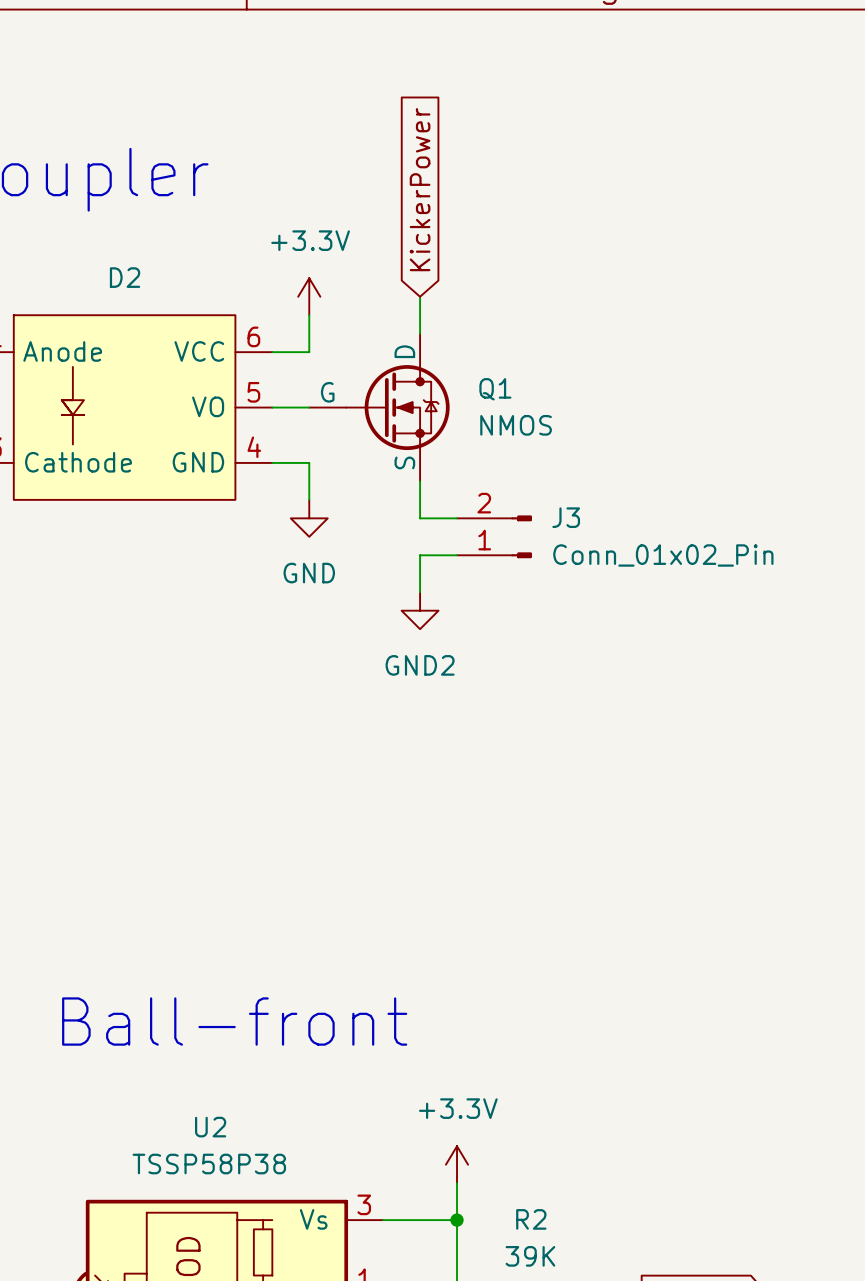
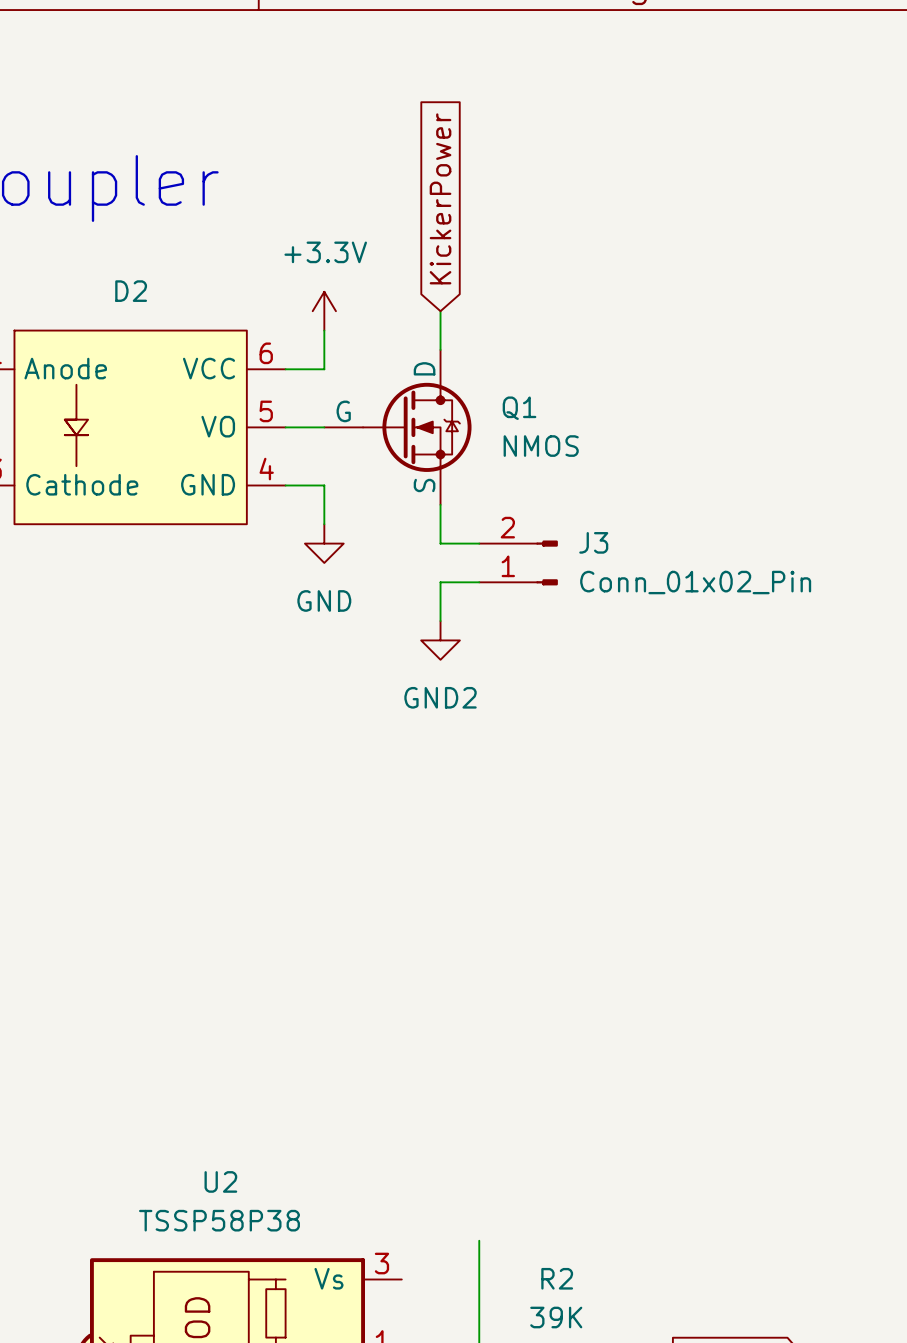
text: Ball-front (234, 1021) -> none
power symbol: +3.3V (457, 1164) -> none
wire: (383, 1220) (457, 1220) -> none
junction: (457, 1220) -> none

